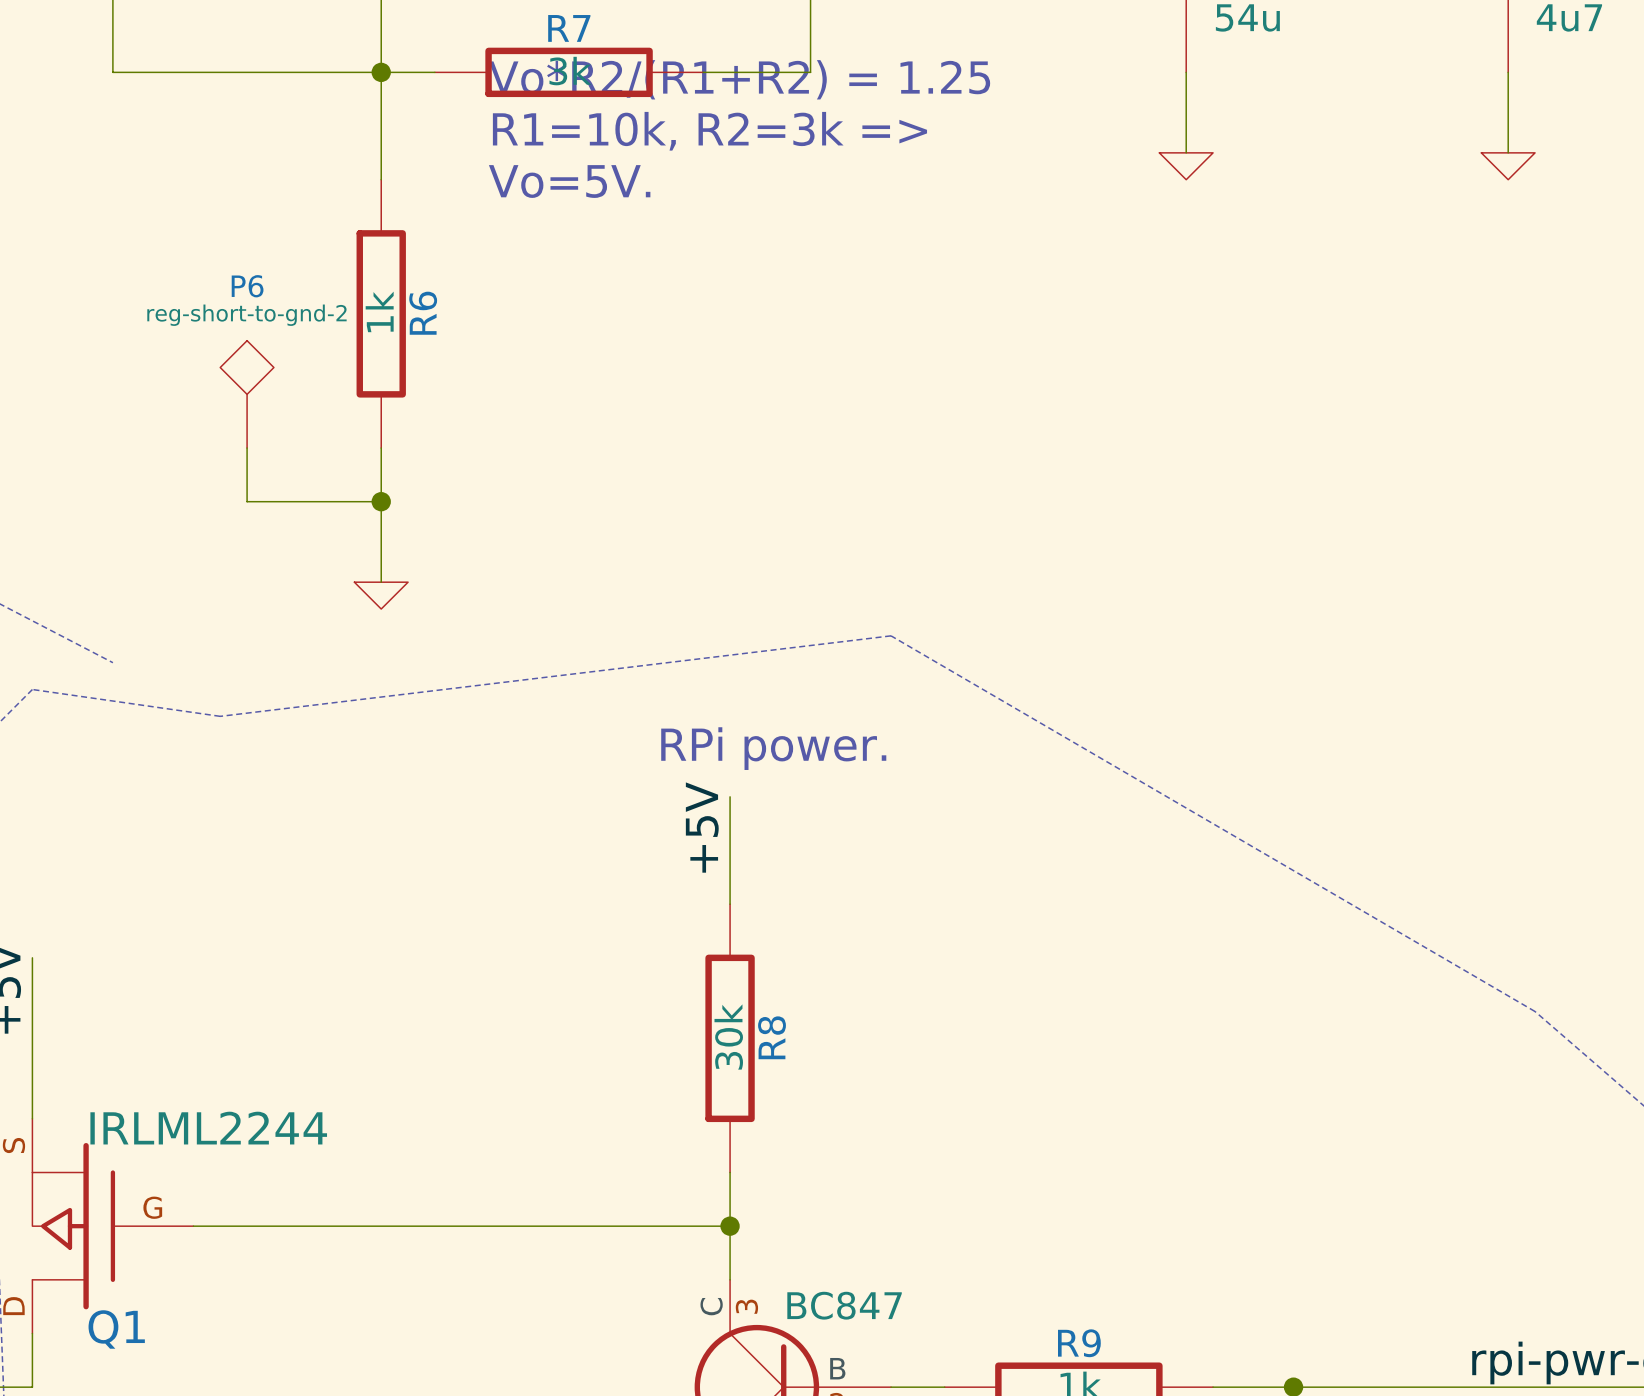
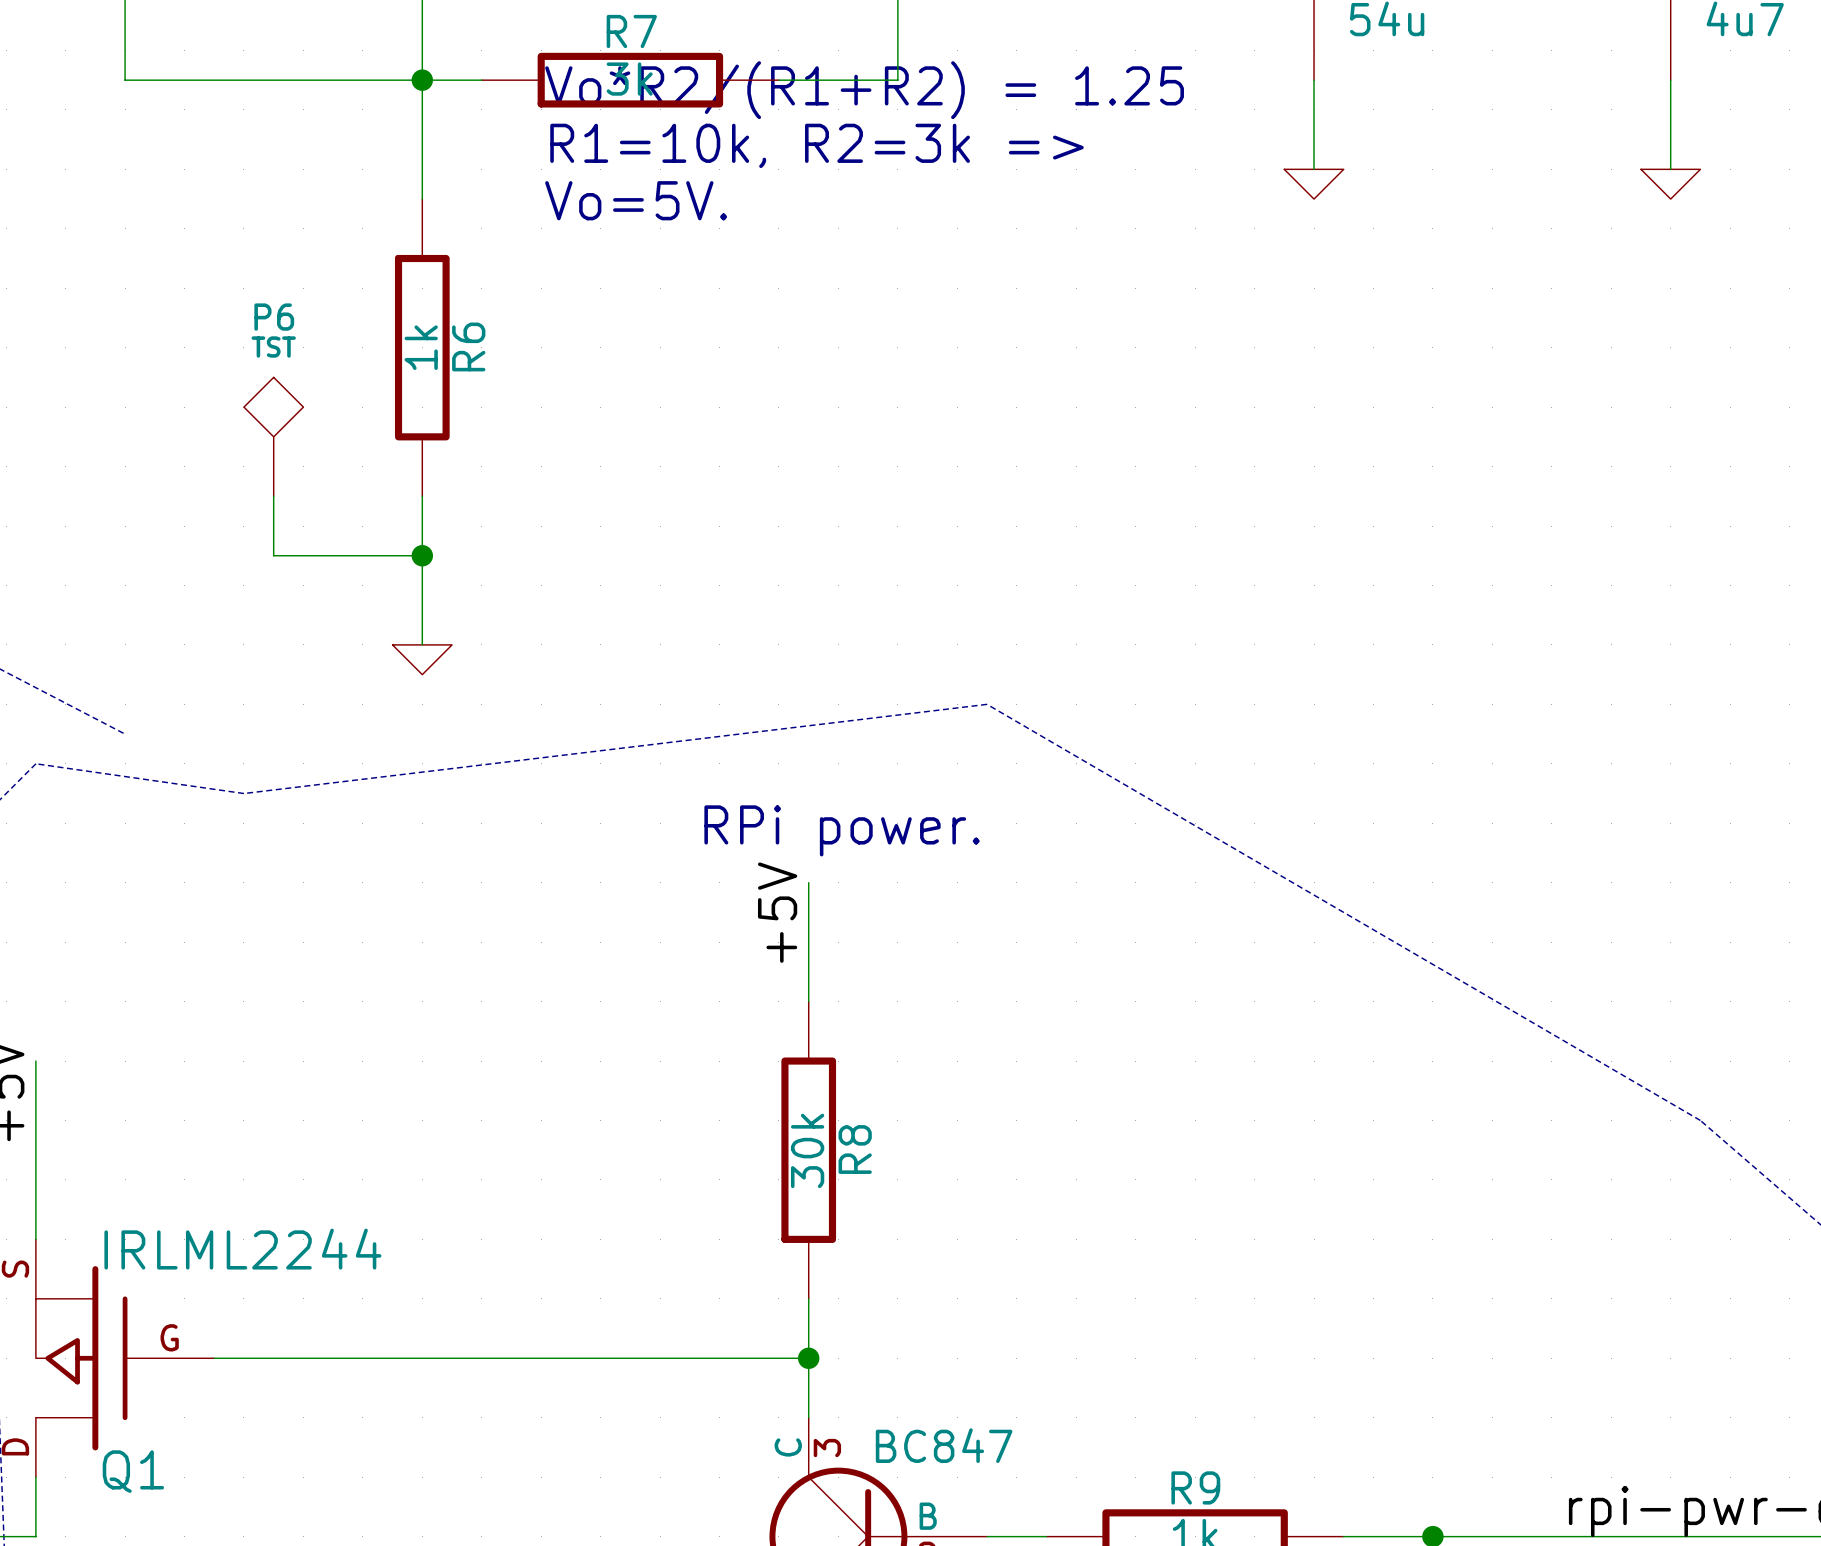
P6 value: reg-short-to-gnd-2 (246, 315) -> TST (273, 347)

